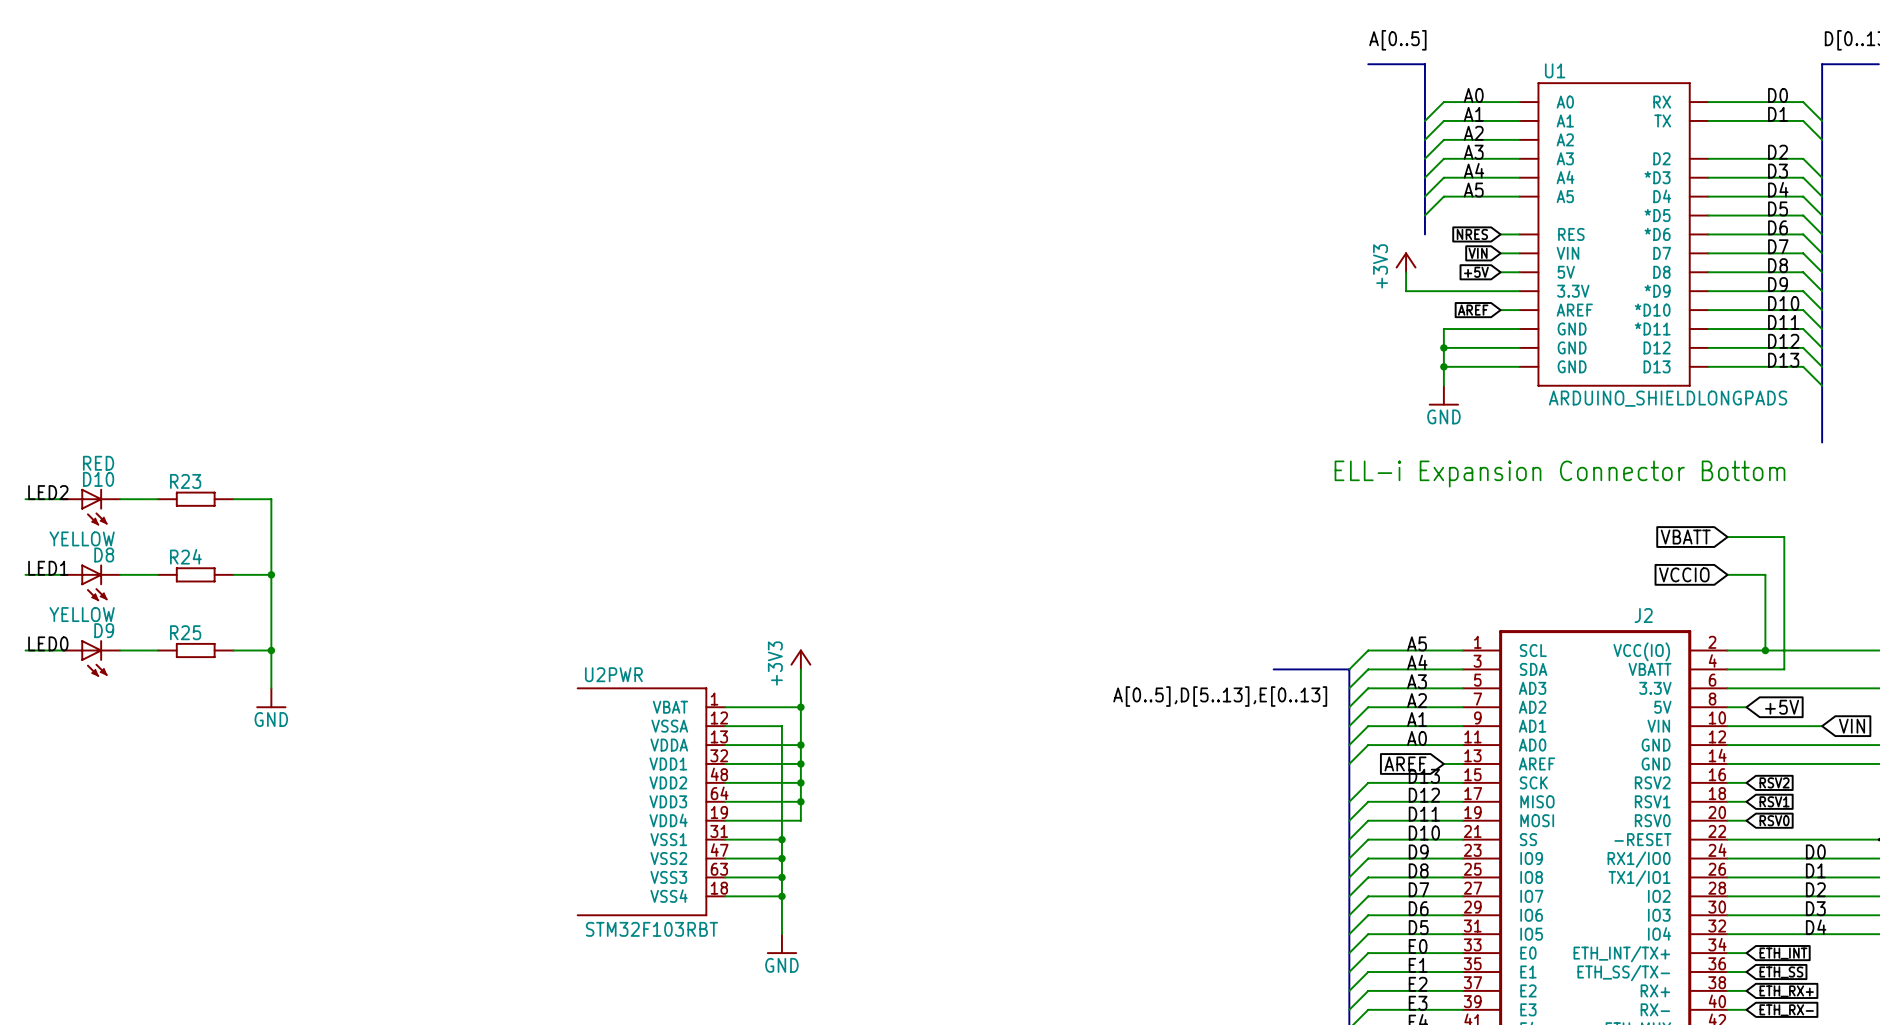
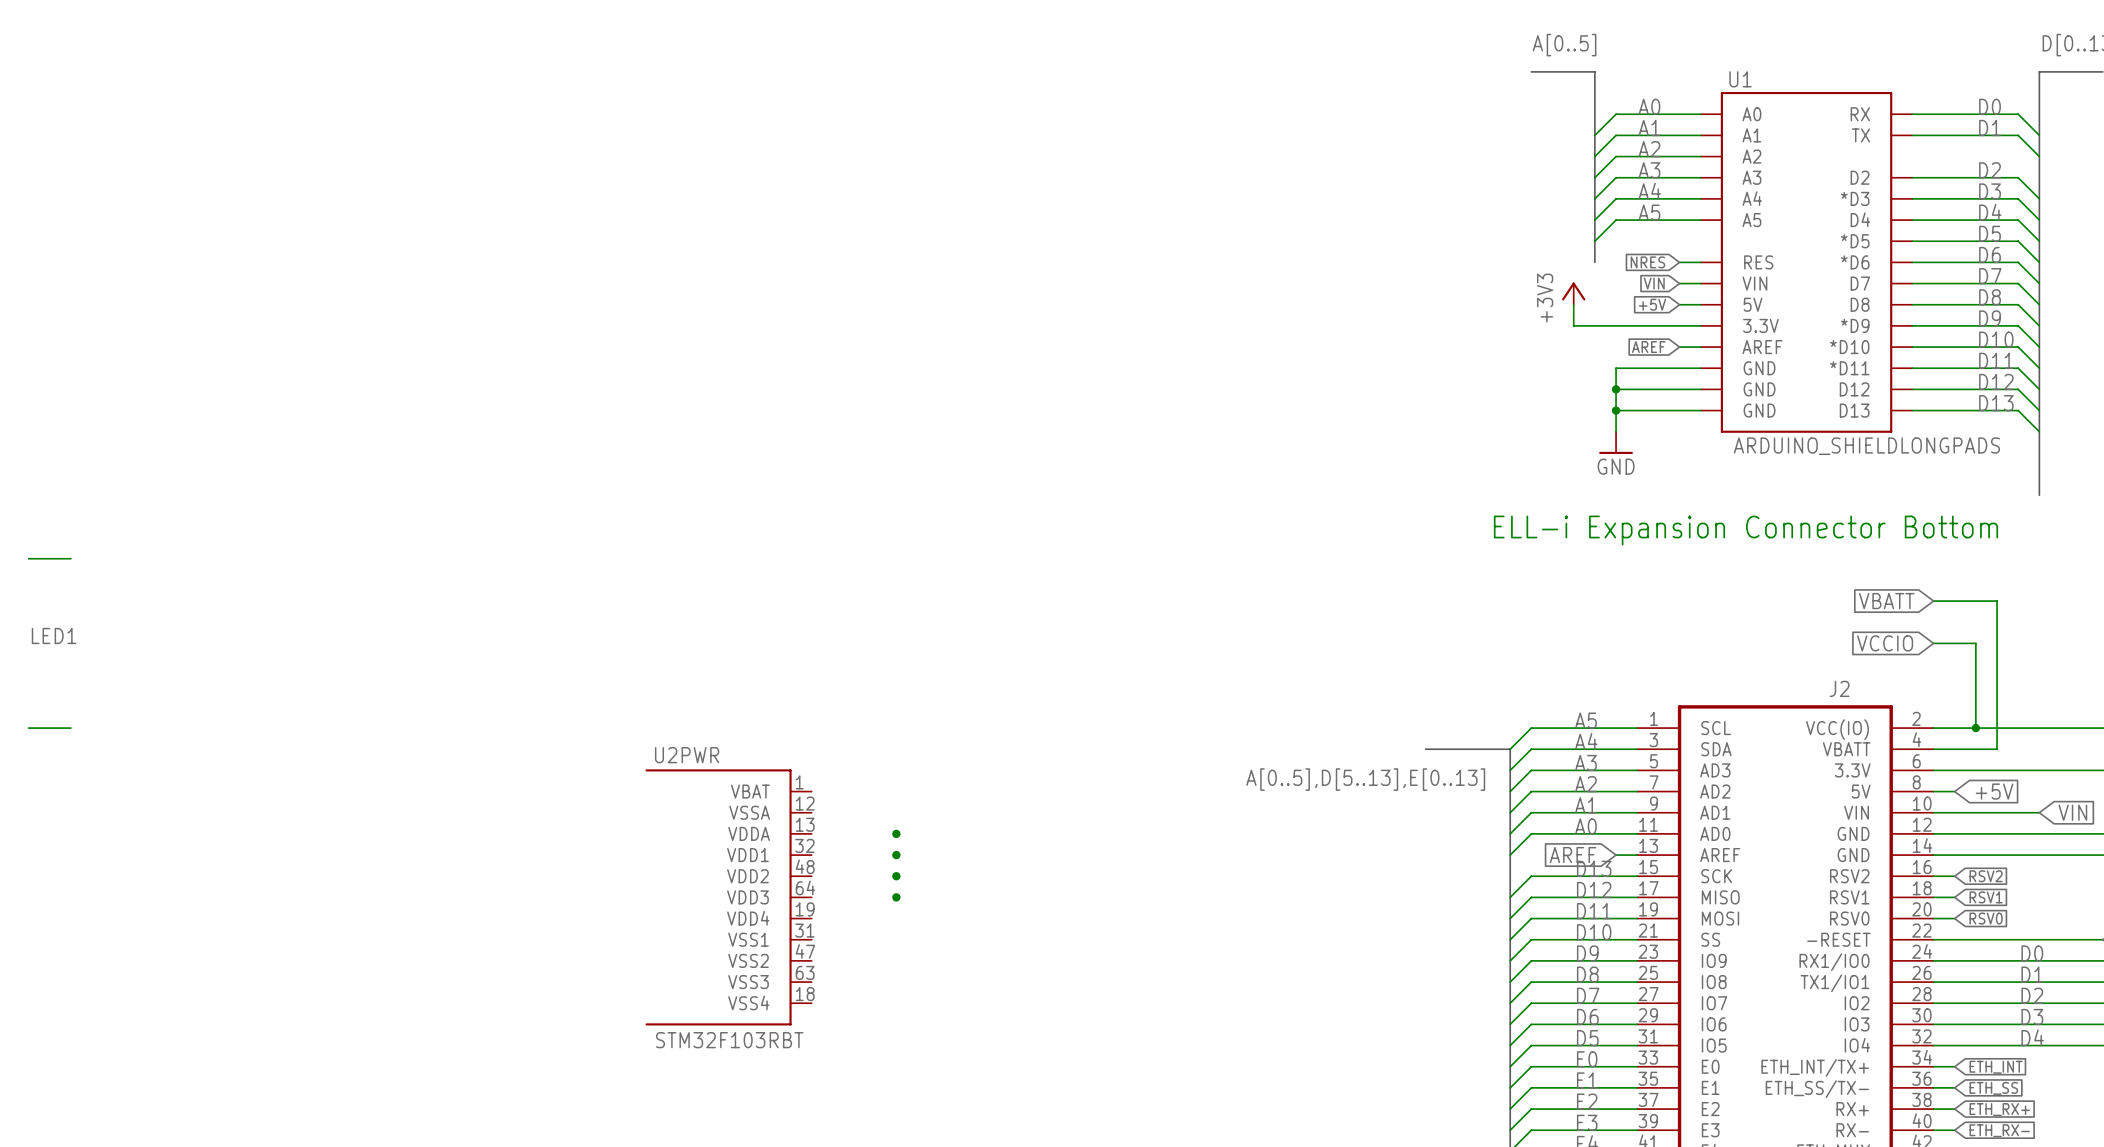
label: LED2 (48, 492) -> none
wire: (120, 499) (157, 499) -> none
R23: (195, 499) -> none
wire: (233, 499) (271, 499) (271, 688) -> none
D10: RED (91, 507) -> none
wire: (25, 574) (63, 574) -> none
wire: (120, 574) (157, 574) -> none
R24: (195, 574) -> none
wire: (233, 574) (271, 574) -> none
junction: (271, 574) -> none
D8: YELLOW (91, 582) -> none
label: LED0 (48, 643) -> none
wire: (120, 650) (157, 650) -> none
R25: (195, 650) -> none
wire: (233, 650) (271, 650) -> none
junction: (271, 650) -> none
D9: YELLOW (91, 658) -> none
power symbol: +3V3 (800, 659) -> none
wire: (800, 669) (800, 820) (725, 820) -> none
power symbol: GND (271, 698) -> none
wire: (725, 707) (800, 707) -> none
junction: (800, 707) -> none
wire: (725, 726) (781, 726) (781, 934) -> none
wire: (725, 745) (800, 745) -> none
wire: (725, 763) (800, 763) -> none
wire: (725, 782) (800, 782) -> none
wire: (725, 801) (800, 801) -> none
wire: (725, 839) (781, 839) -> none
junction: (781, 839) -> none
wire: (725, 858) (781, 858) -> none
junction: (781, 858) -> none
wire: (725, 877) (781, 877) -> none
junction: (781, 877) -> none
wire: (725, 896) (781, 896) -> none
junction: (781, 896) -> none
power symbol: GND (781, 944) -> none

